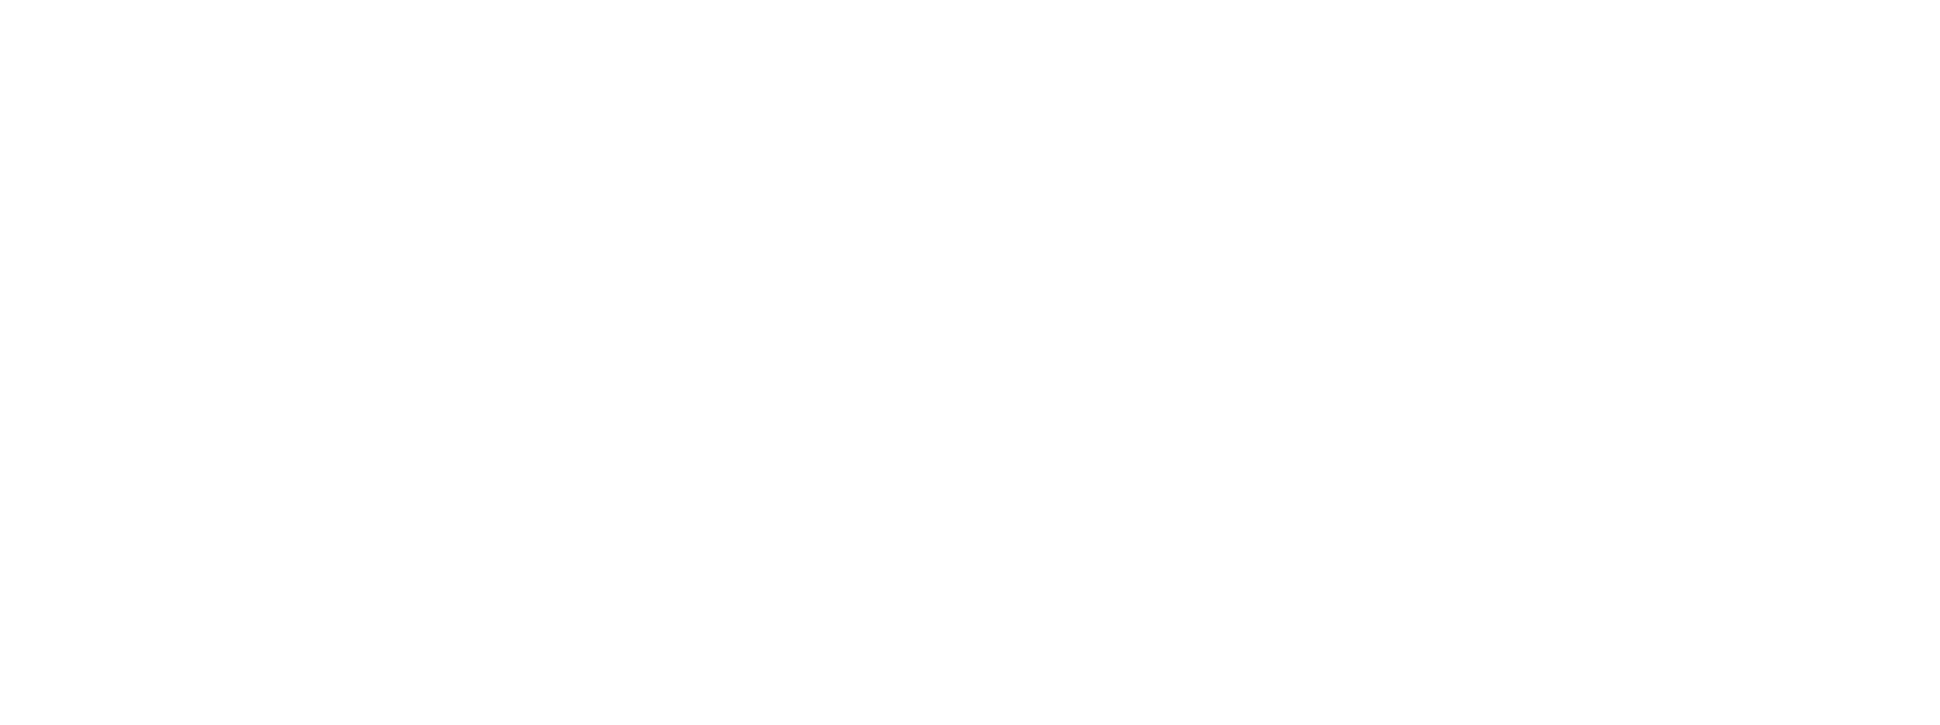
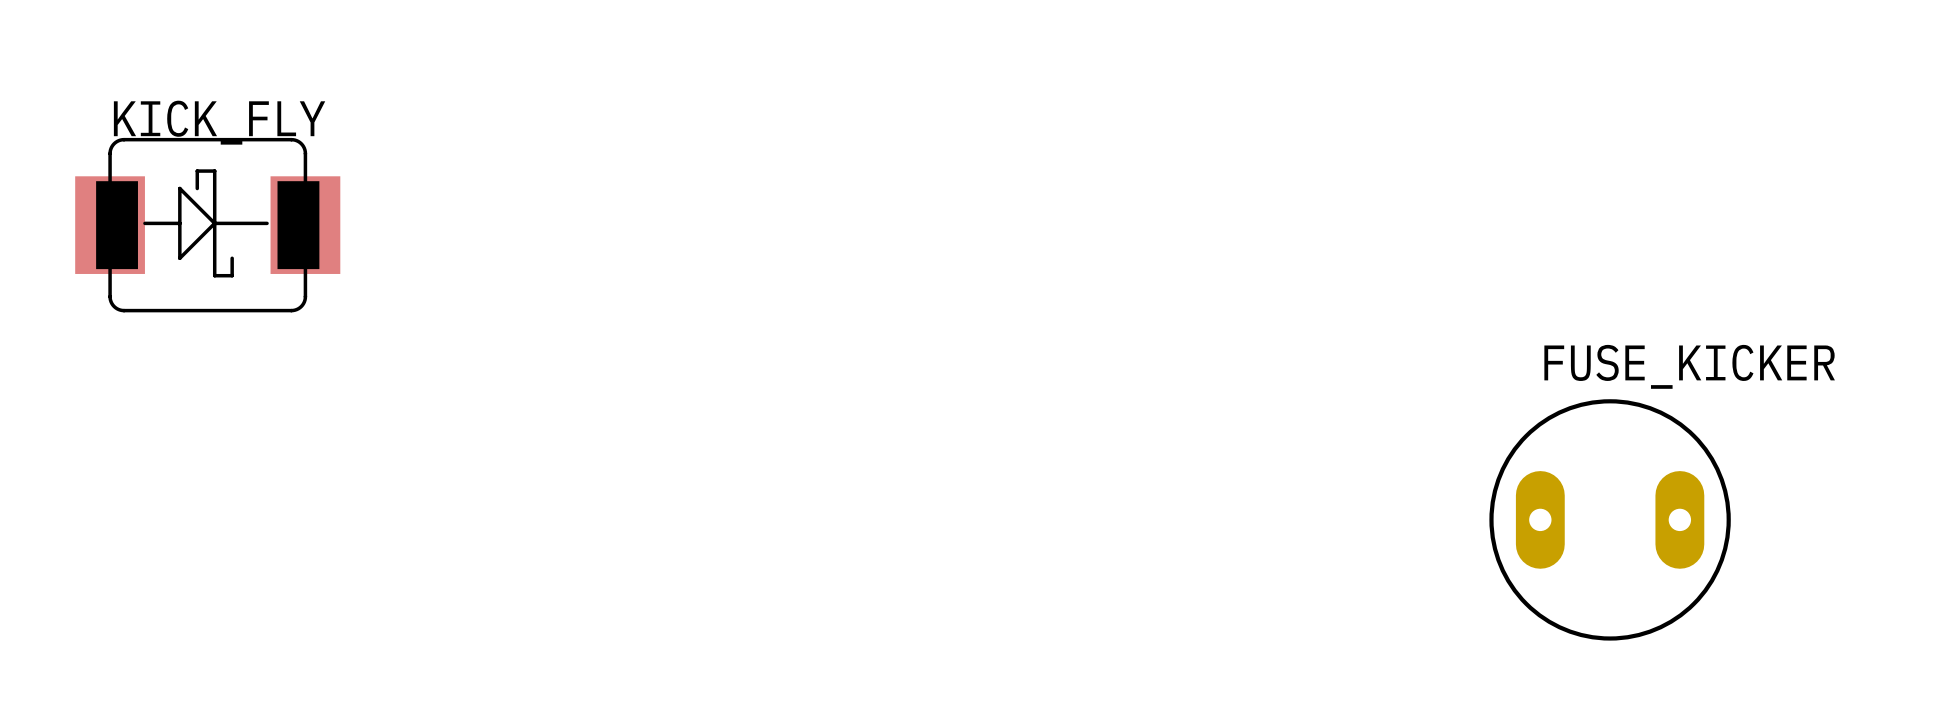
KICK_FLY: none -> (207, 225)
FUSE_KICKER: none -> (1610, 519)

